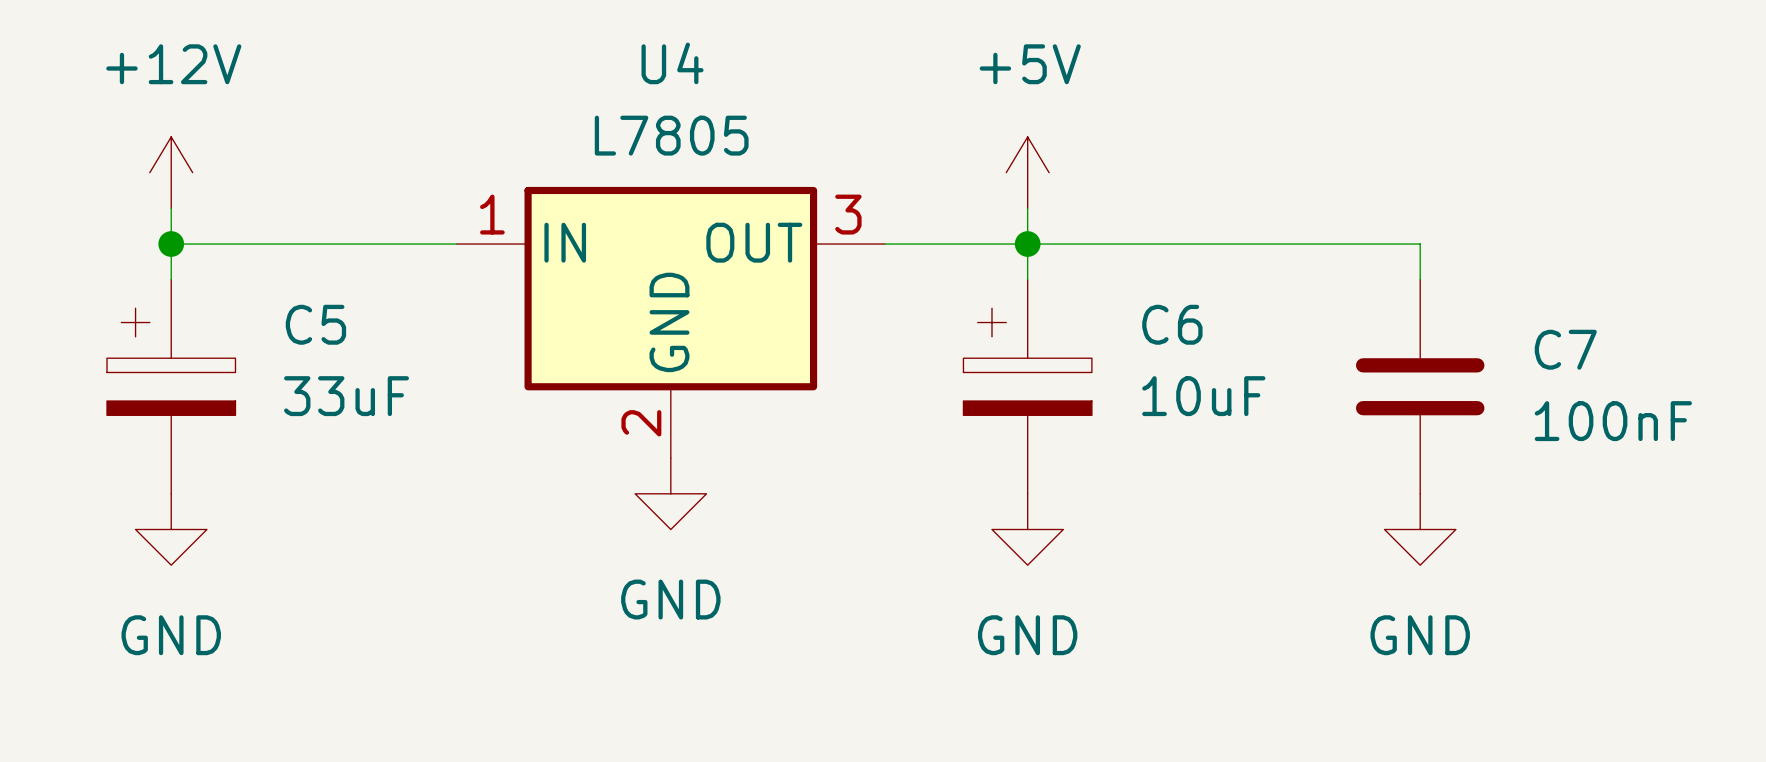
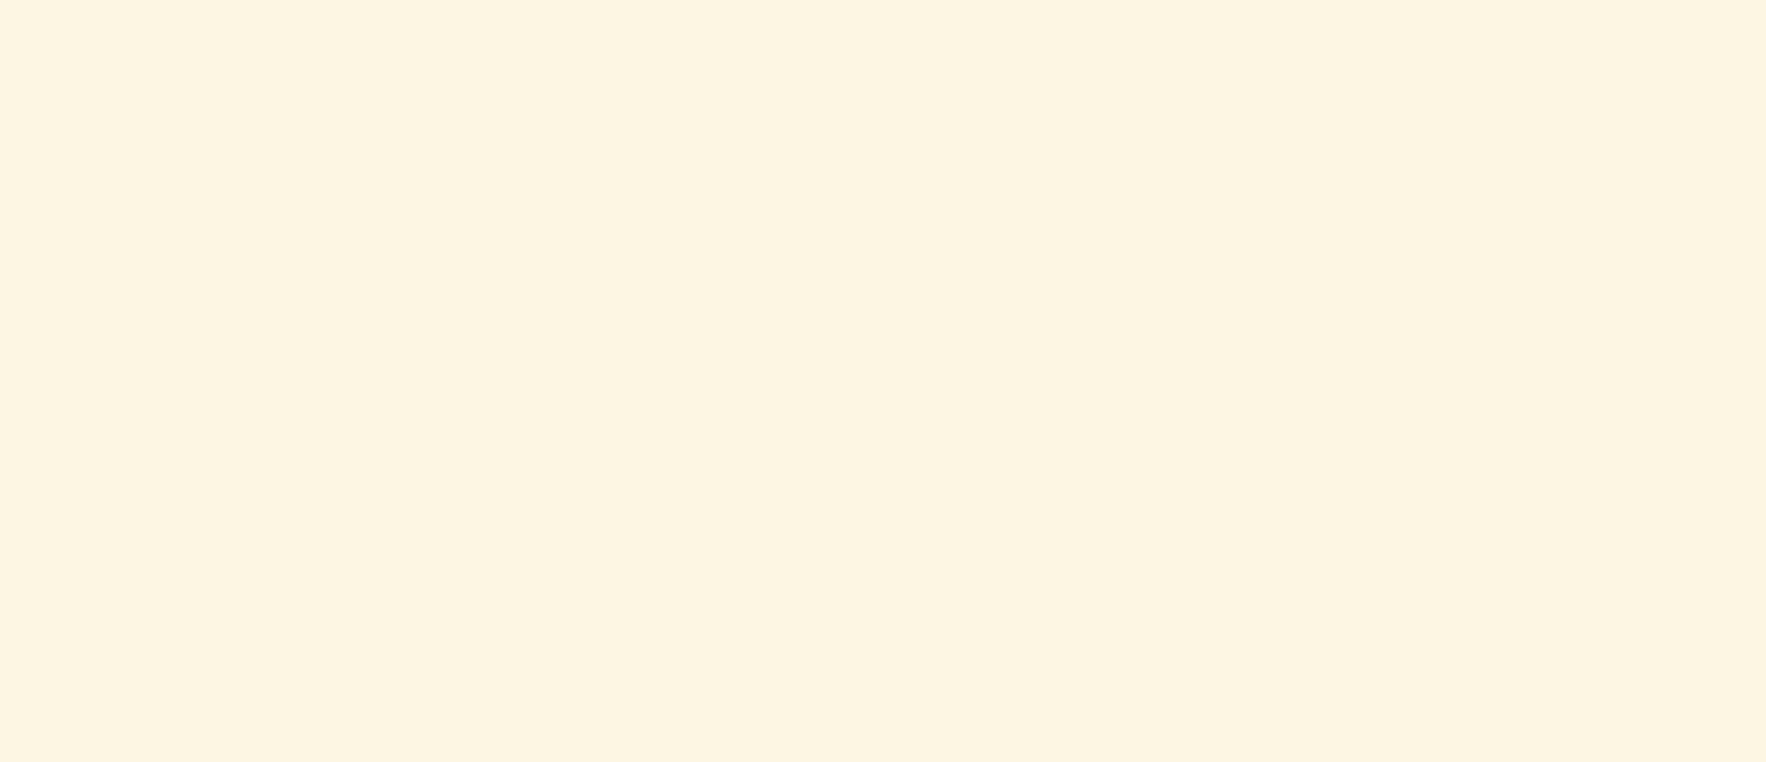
power symbol: +12V (171, 172) -> none
power symbol: +5V (1027, 172) -> none
wire: (171, 208) (171, 279) -> none
wire: (1027, 208) (1027, 279) -> none
wire: (171, 244) (456, 244) -> none
junction: (171, 244) -> none
wire: (884, 244) (1420, 244) (1420, 279) -> none
junction: (1027, 244) -> none
U4: L7805 (670, 322) -> none
C5: 33uF (171, 386) -> none
C6: 10uF (1027, 386) -> none
C7: 100nF (1420, 386) -> none
power symbol: GND (670, 493) -> none
power symbol: GND (171, 529) -> none
power symbol: GND (1027, 529) -> none
power symbol: GND (1420, 529) -> none

